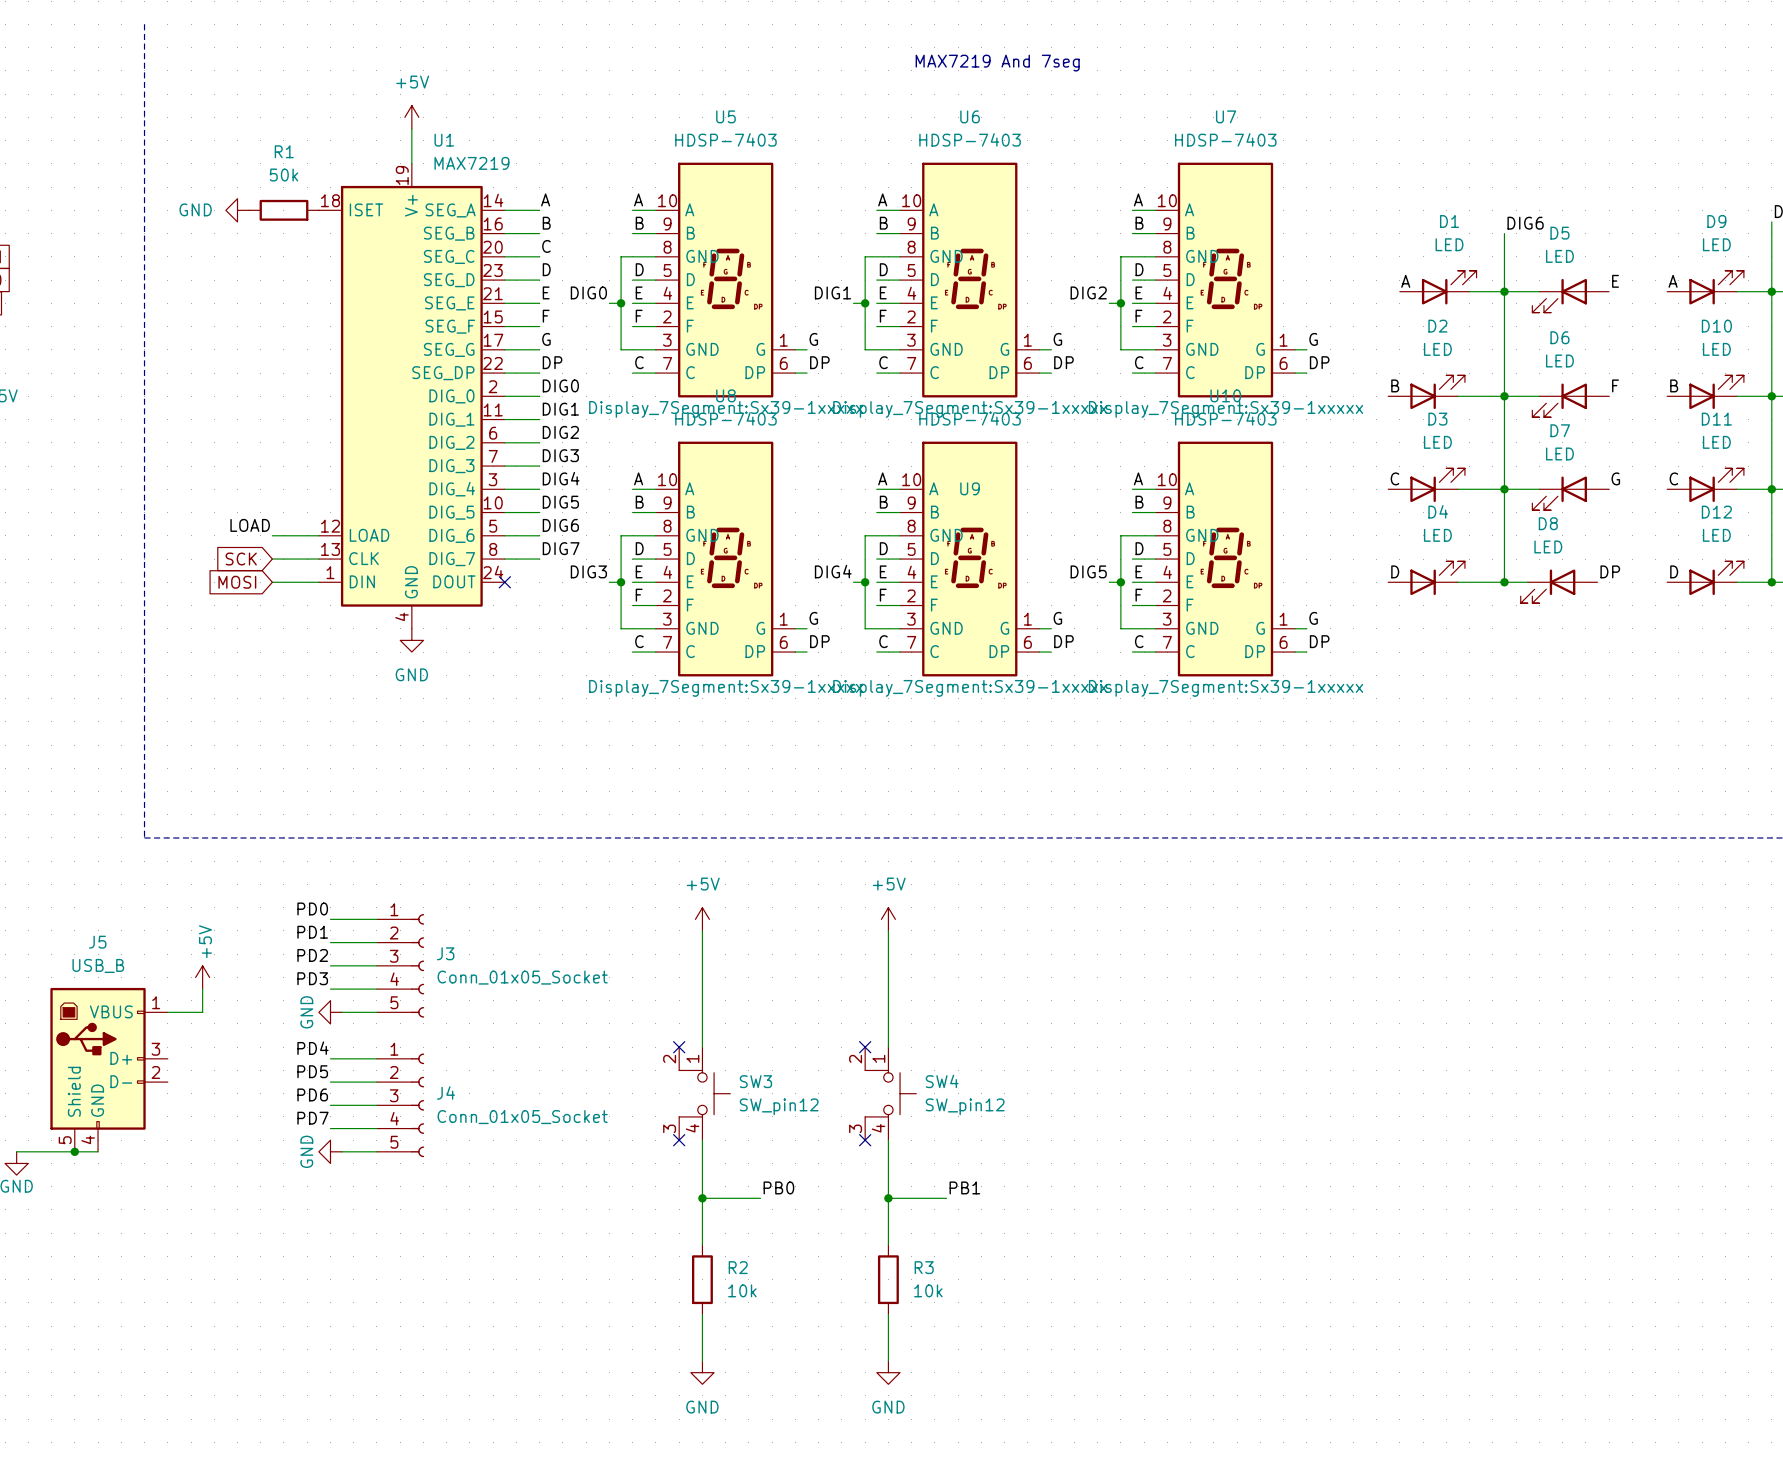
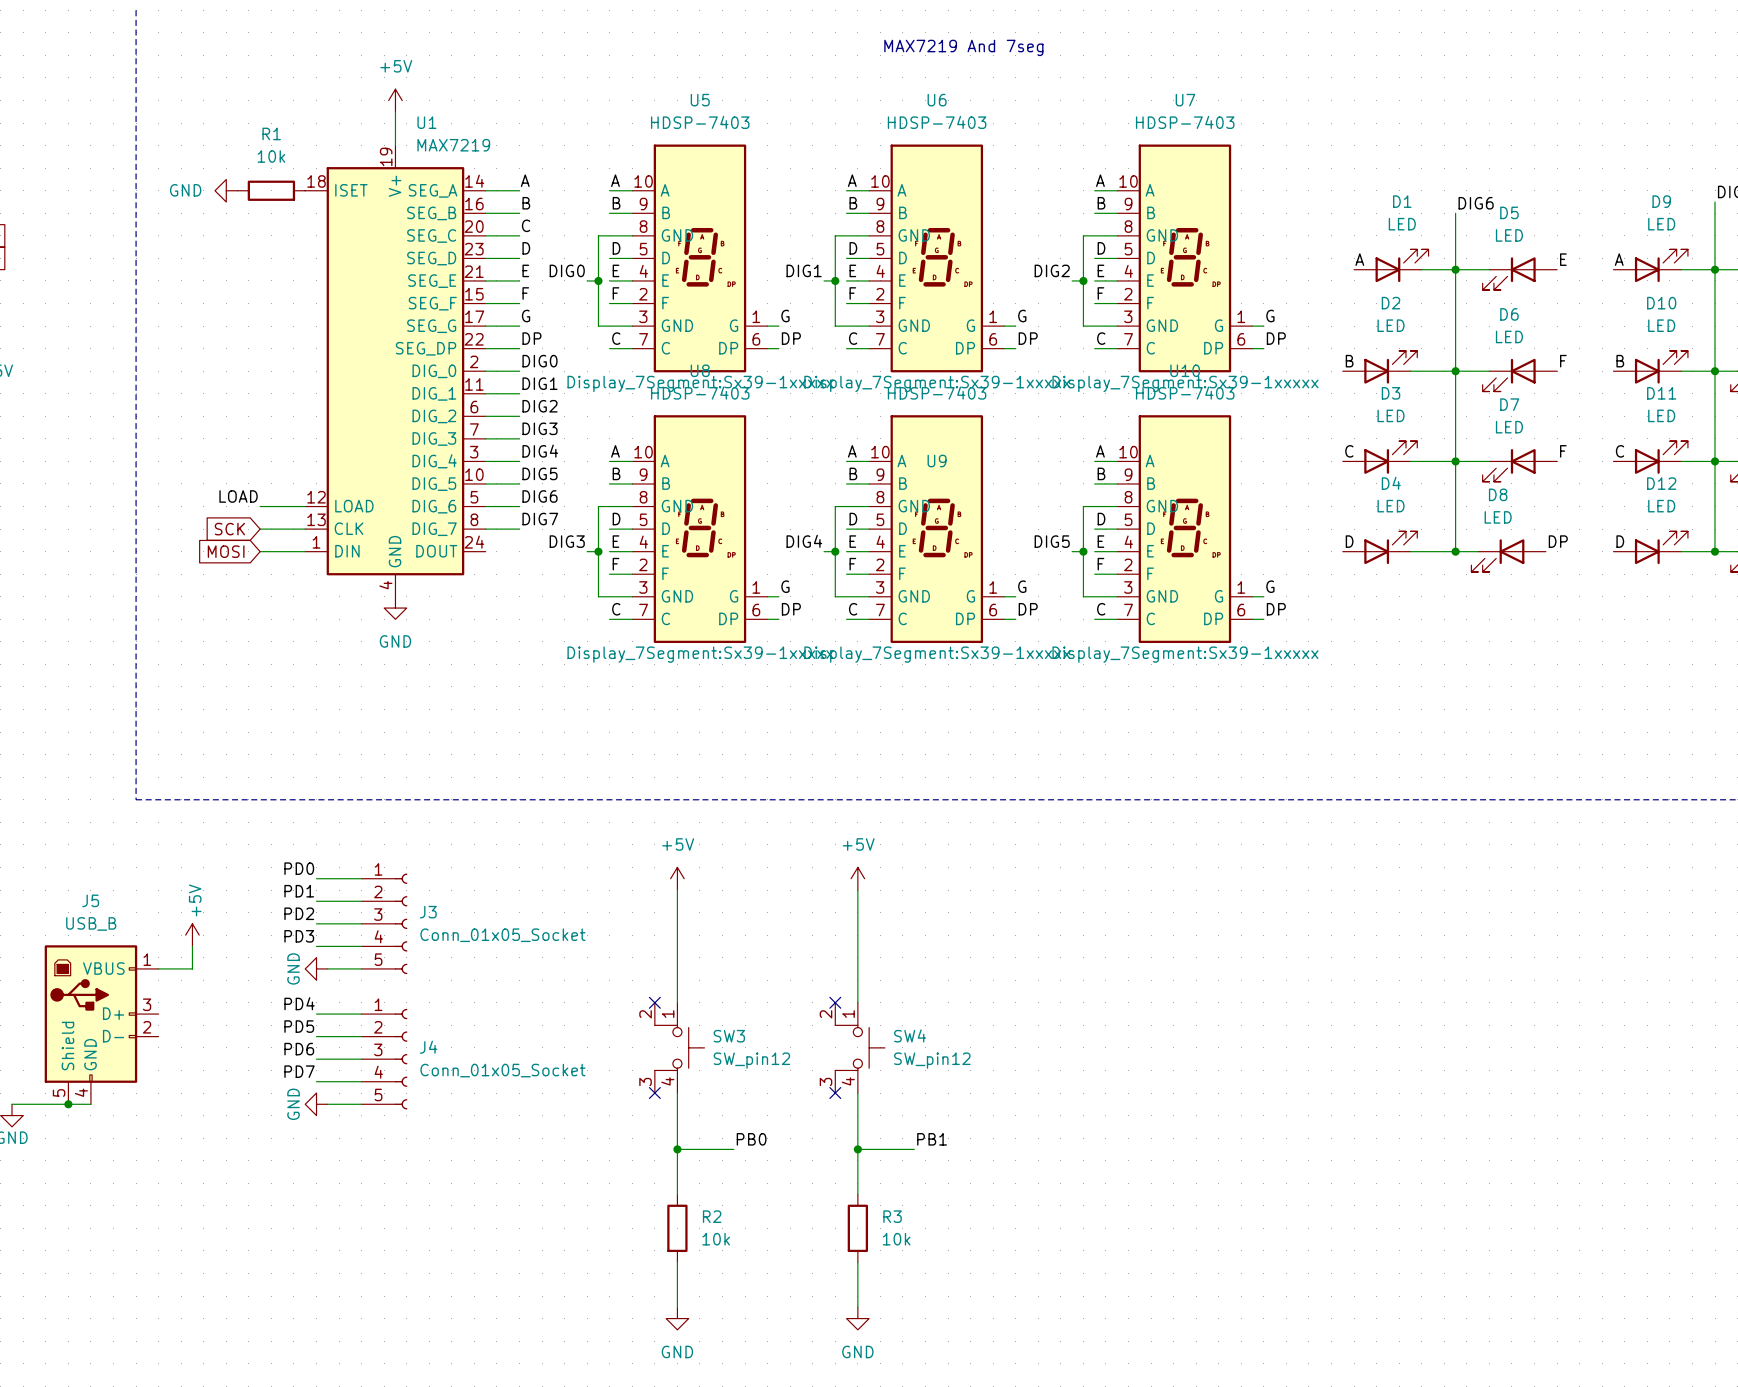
R1 value: 50k (283, 175) -> 10k (271, 156)
label: G (1615, 478) -> F (1563, 451)
no-connect mark: (504, 582) -> none

